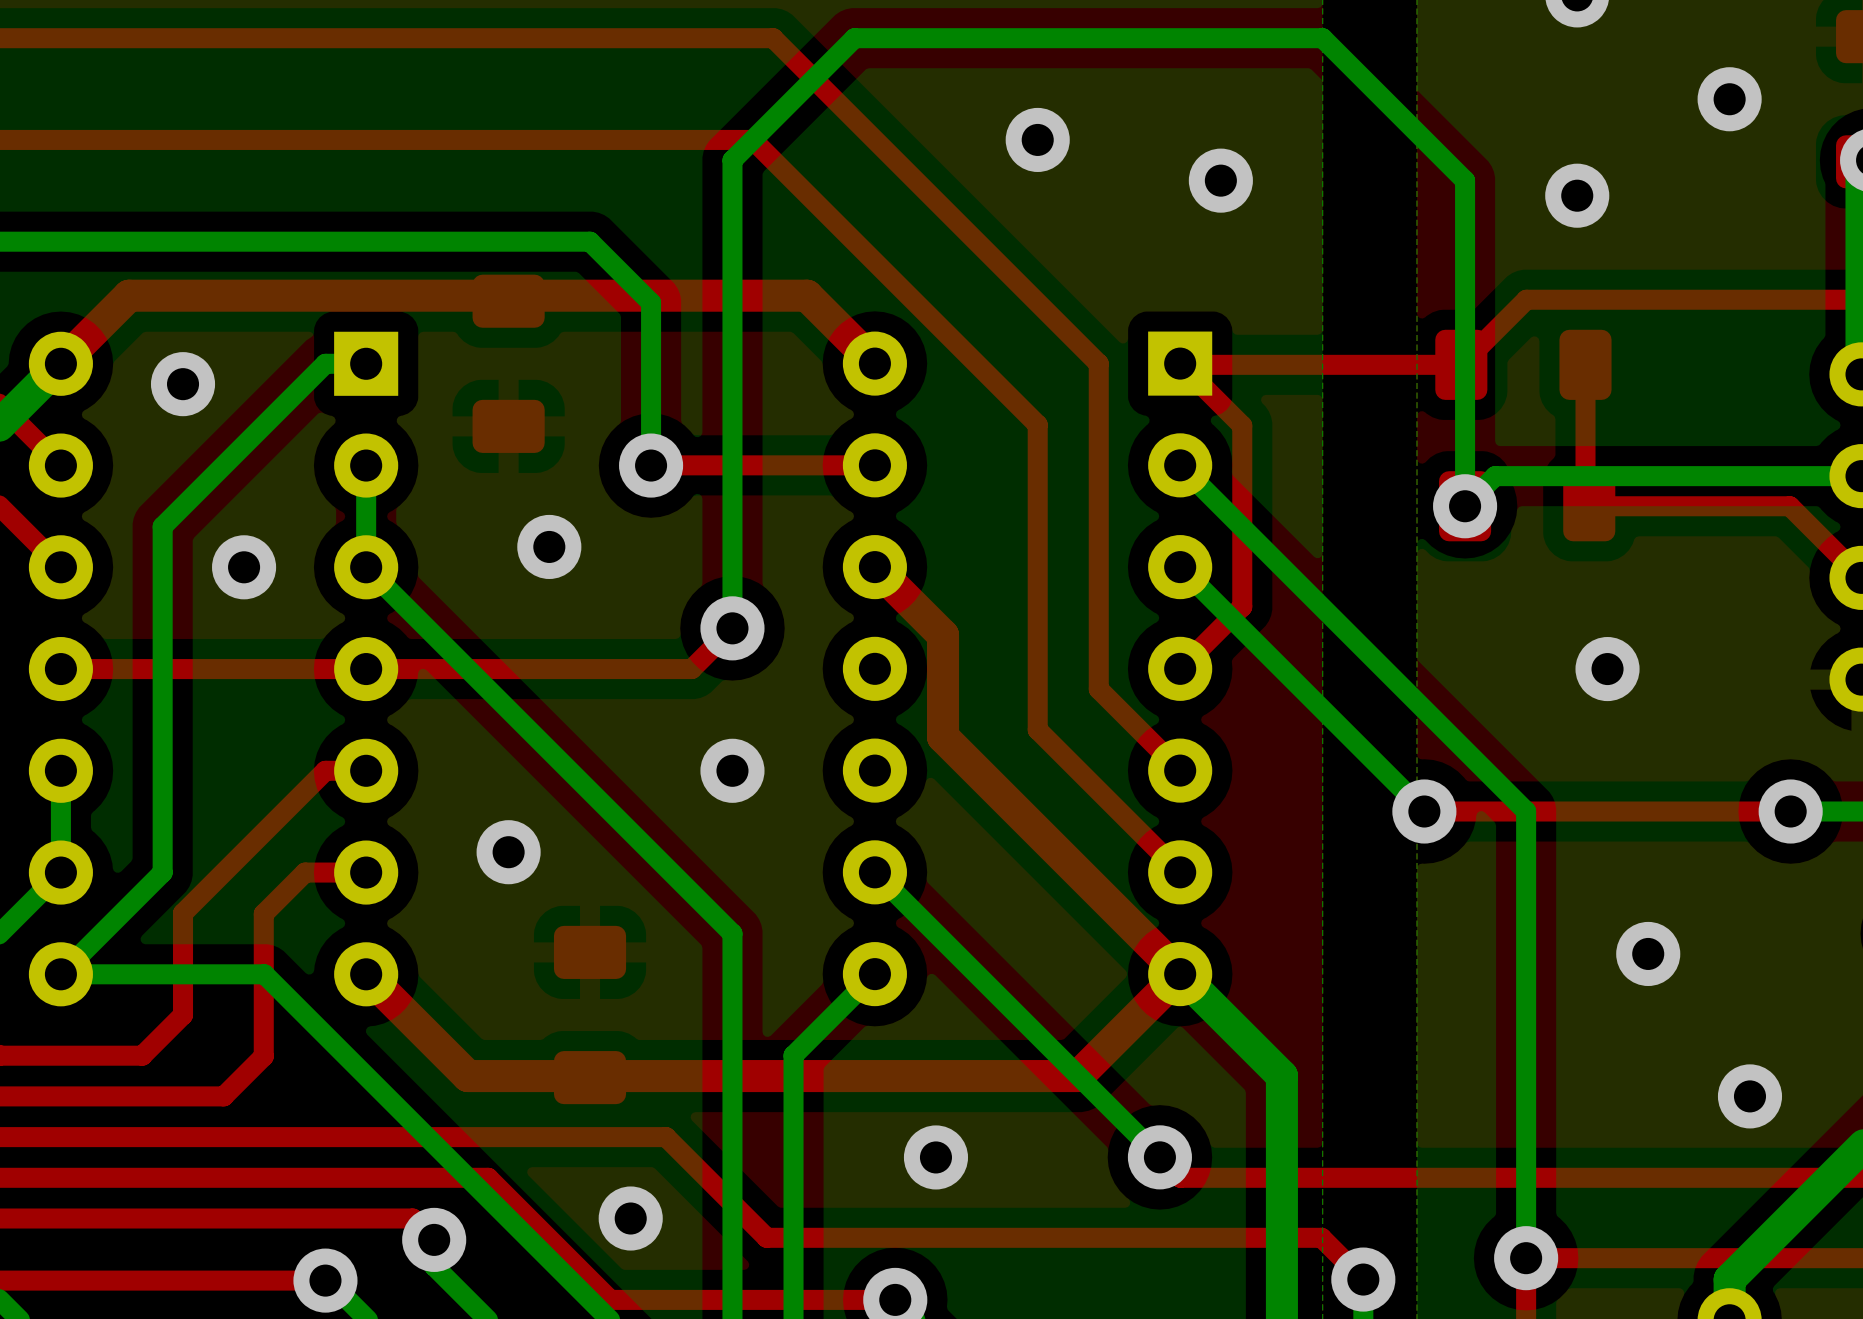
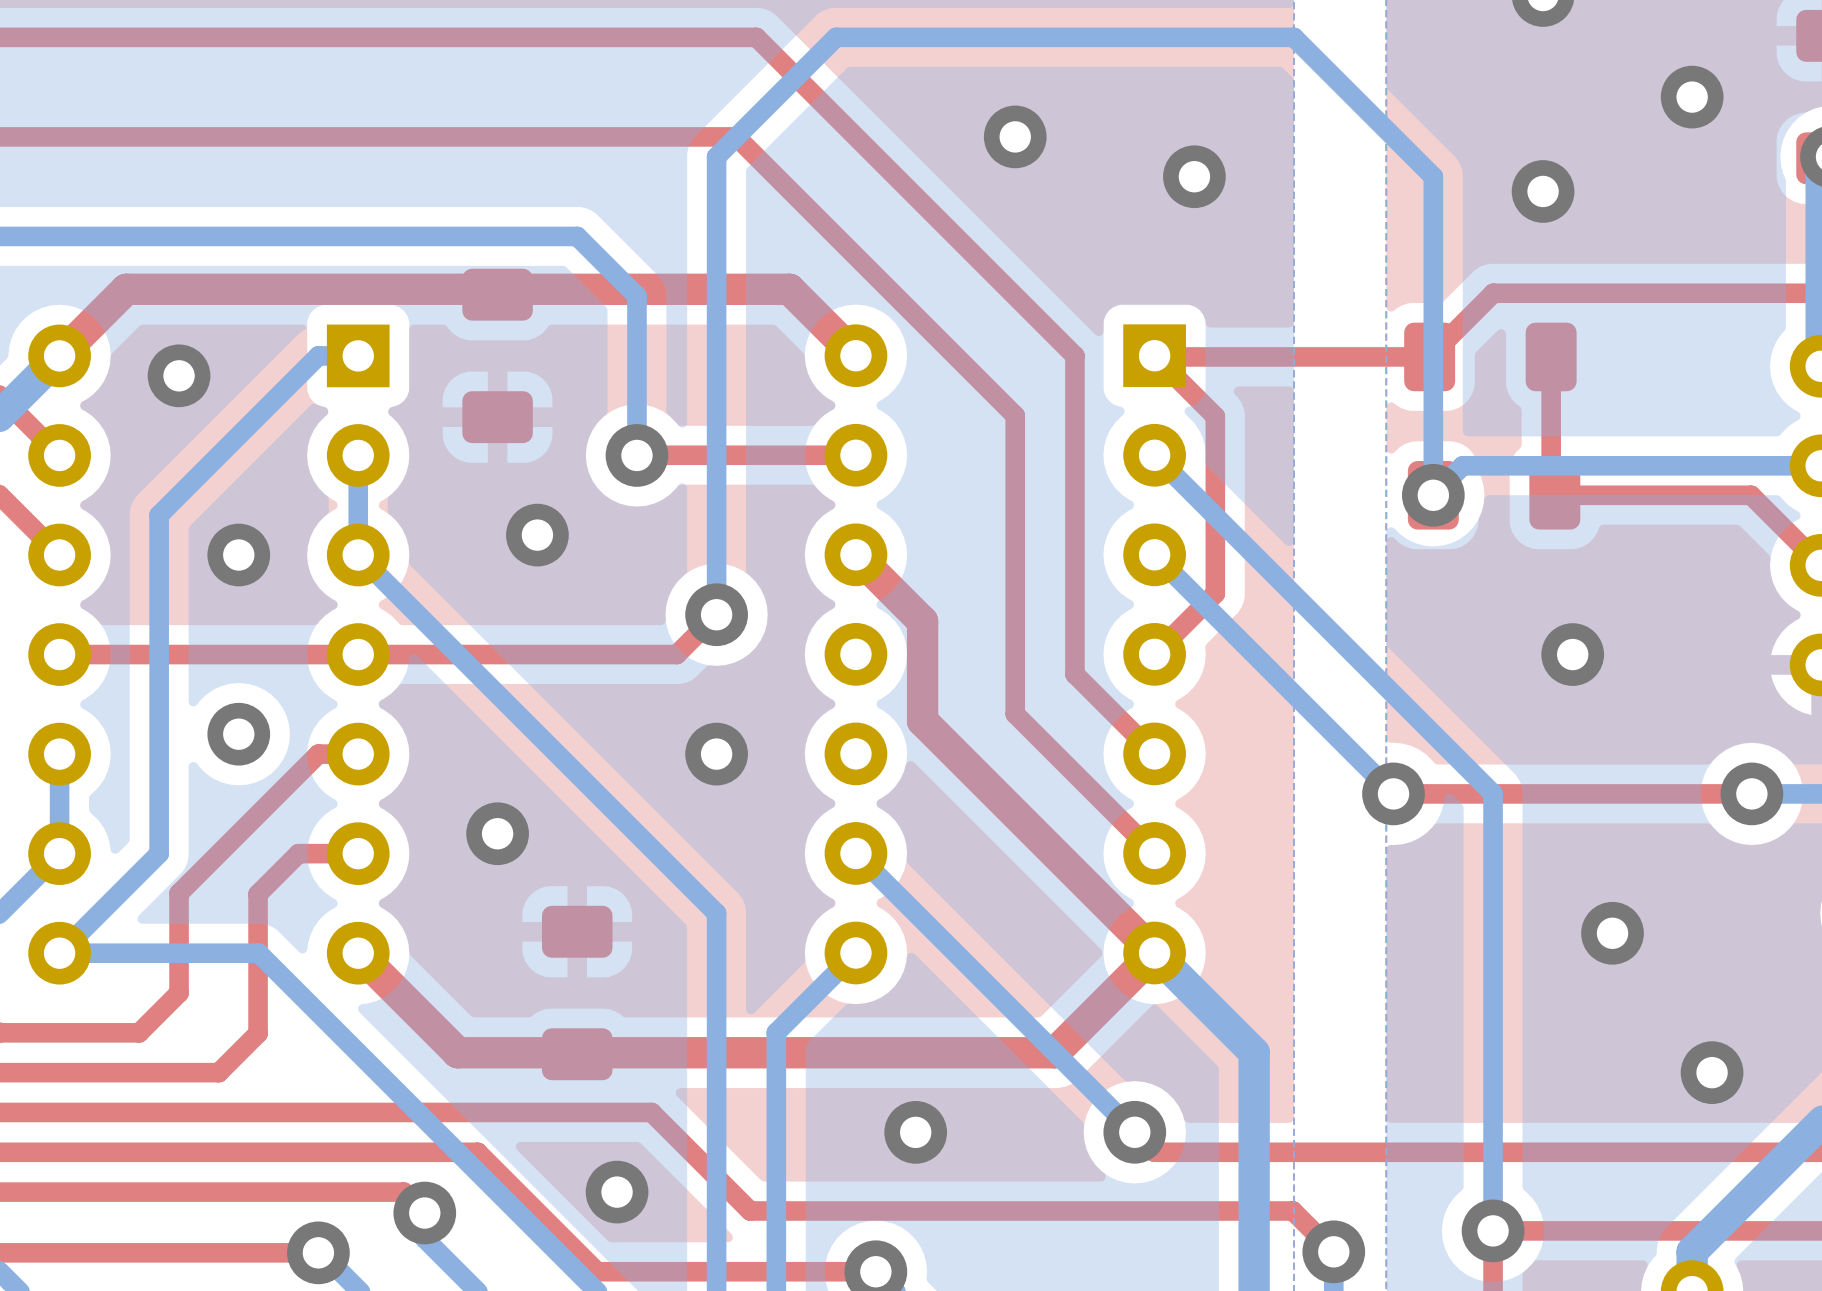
via: none -> (238, 734)

